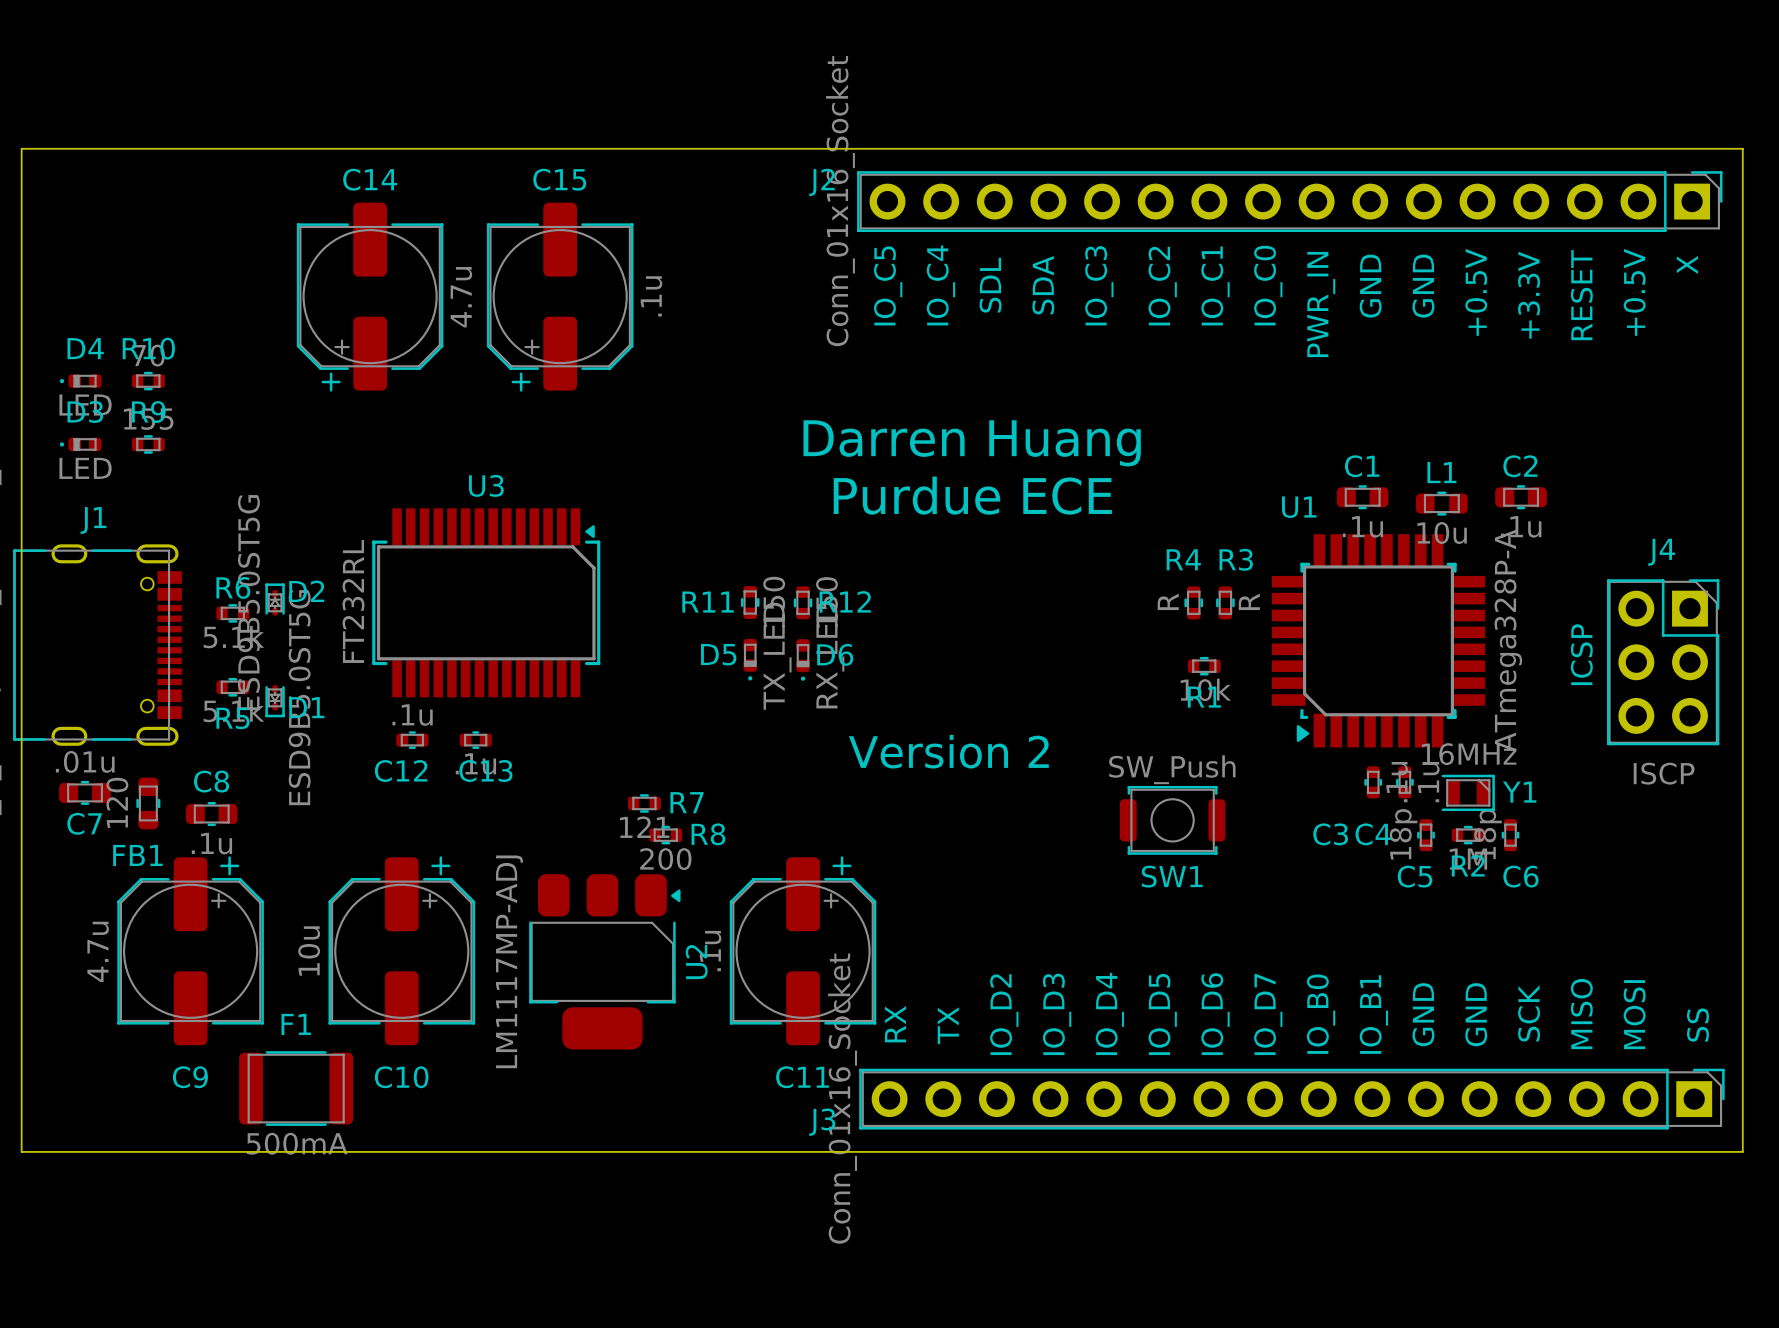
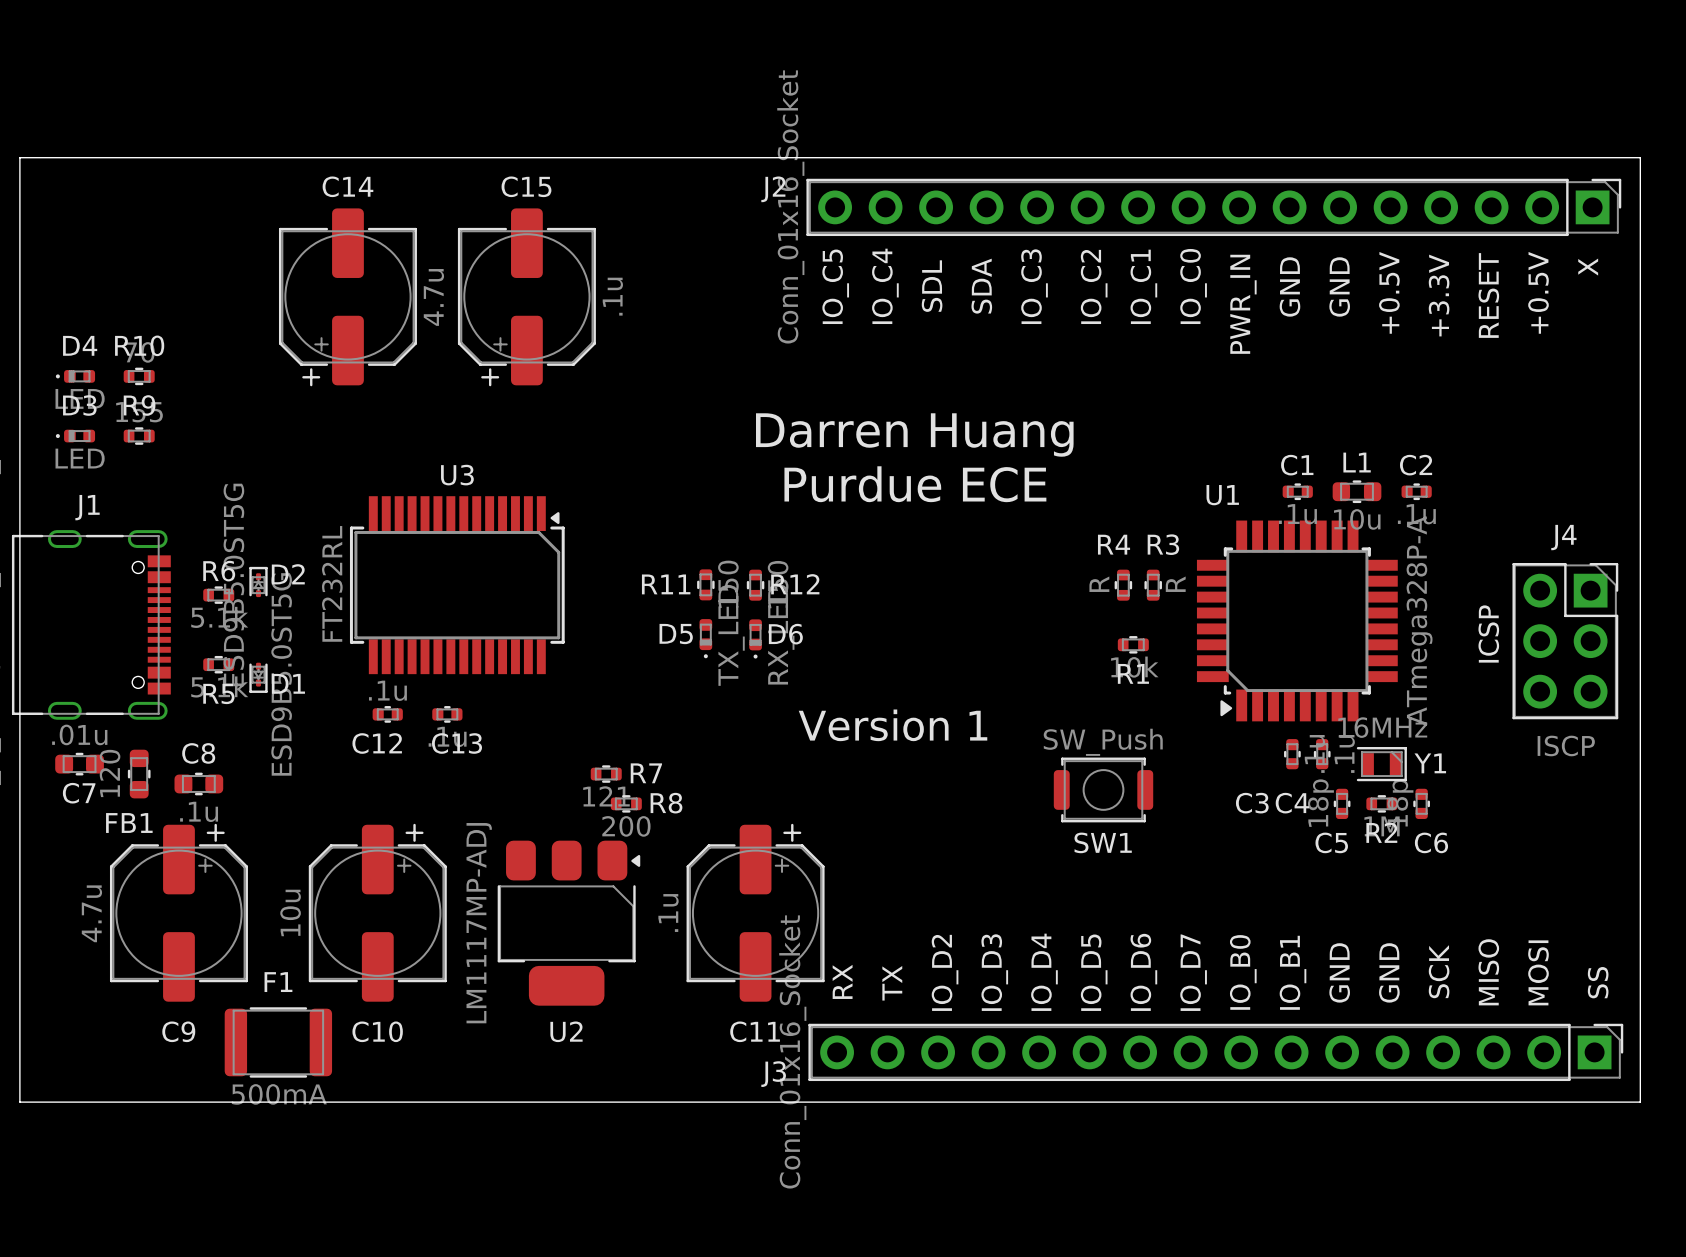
C1 footprint: [1336, 485, 1389, 510] -> [1282, 483, 1313, 501]
C2 footprint: [1495, 485, 1547, 510] -> [1401, 483, 1432, 501]
text: Version 2 (948, 751) -> Version 1 (893, 725)
U2 name rotation: 0° (696, 962) -> 90° clockwise (566, 1031)
U2 name position: U2 (696, 962) -> U2 (566, 1031)

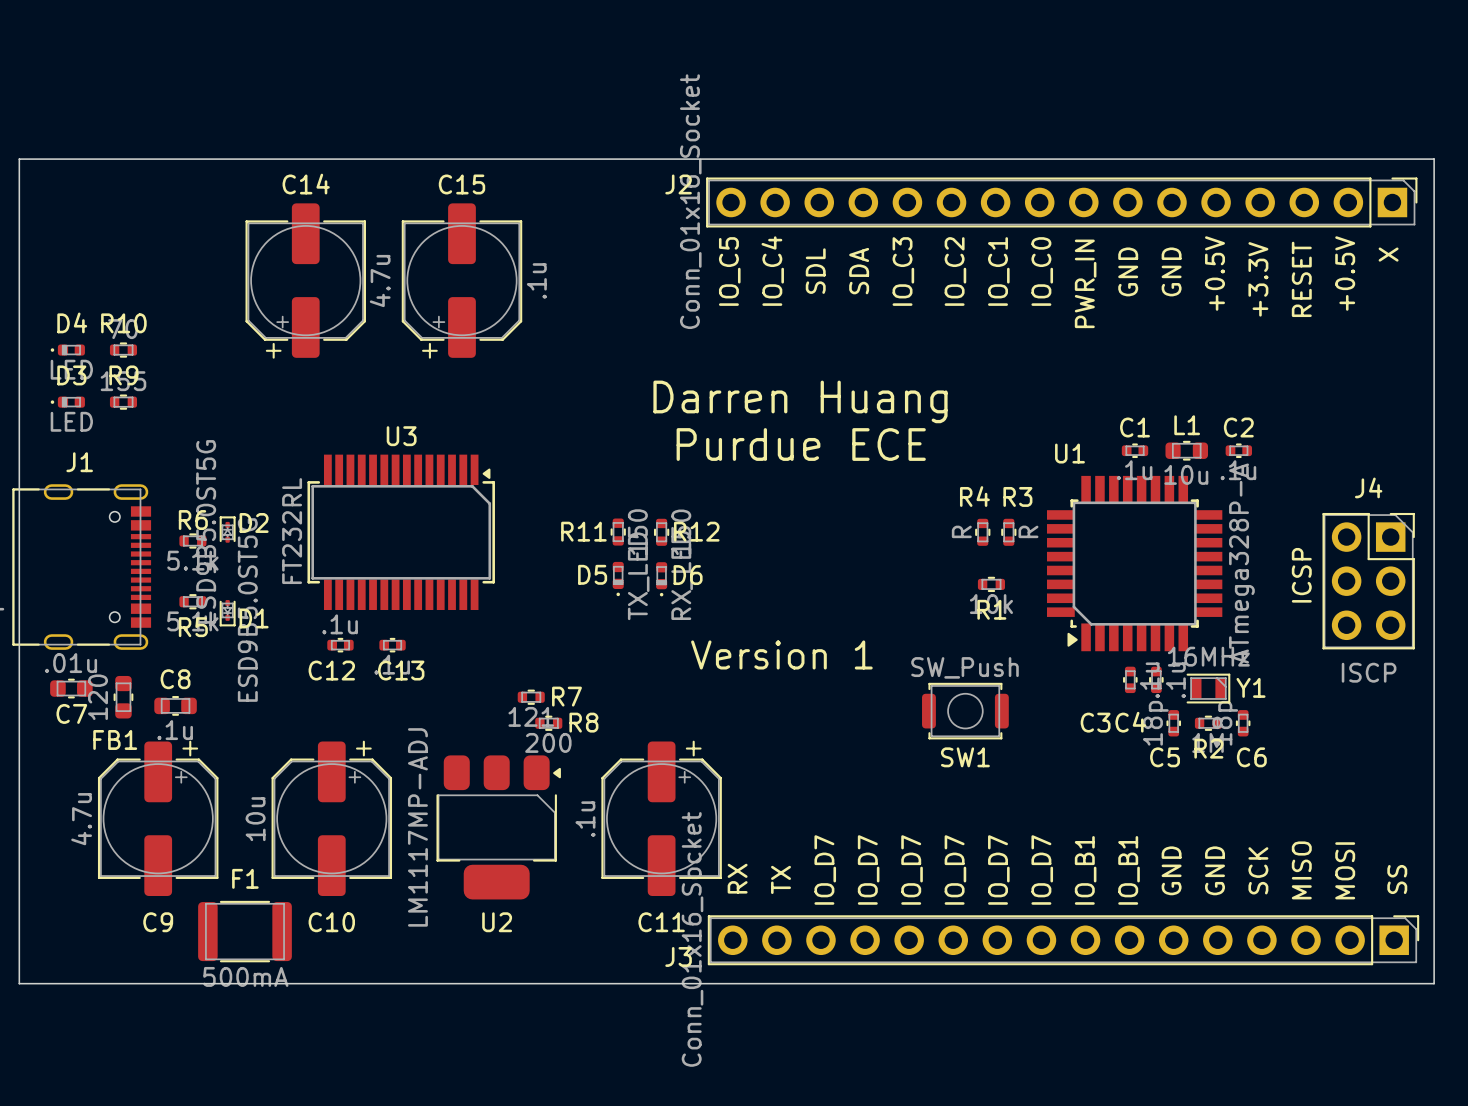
J1 footprint: [11, 530, 171, 720] -> [12, 484, 152, 650]
text: IO_D2 (945, 972) -> IO_D7 (825, 869)
text: IO_D3 (994, 972) -> IO_D7 (868, 869)
text: IO_D4 (1044, 972) -> IO_D7 (912, 869)
text: IO_D5 (1094, 972) -> IO_D7 (955, 869)
text: IO_D6 (1143, 972) -> IO_D7 (998, 869)
text: IO_B0 (1243, 972) -> IO_B1 (1085, 870)

